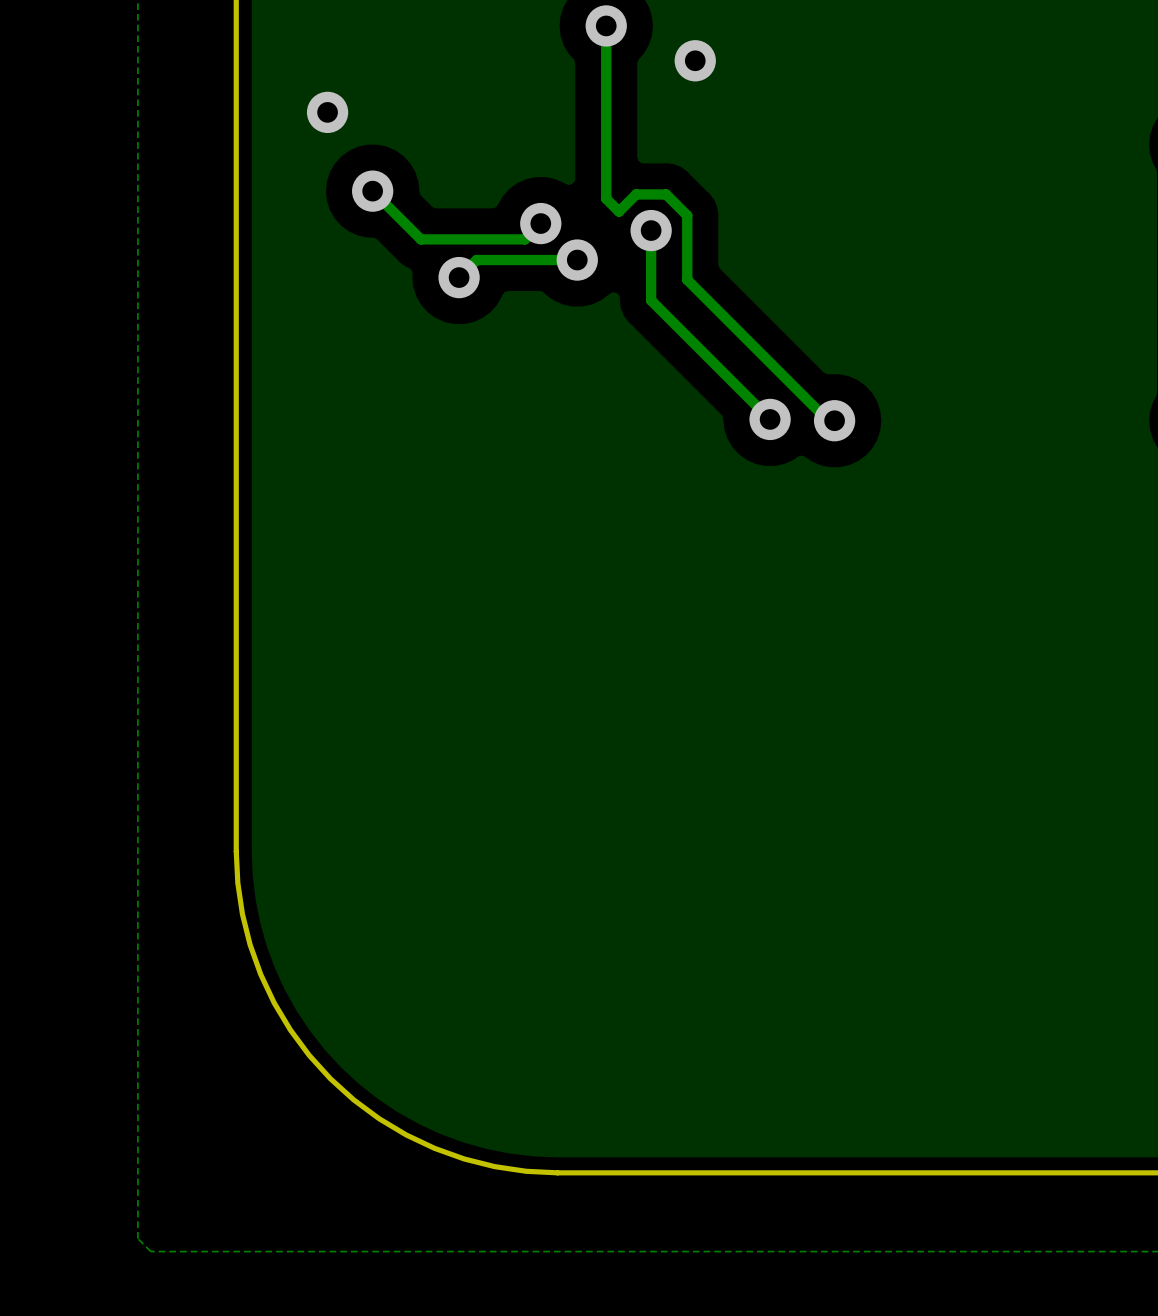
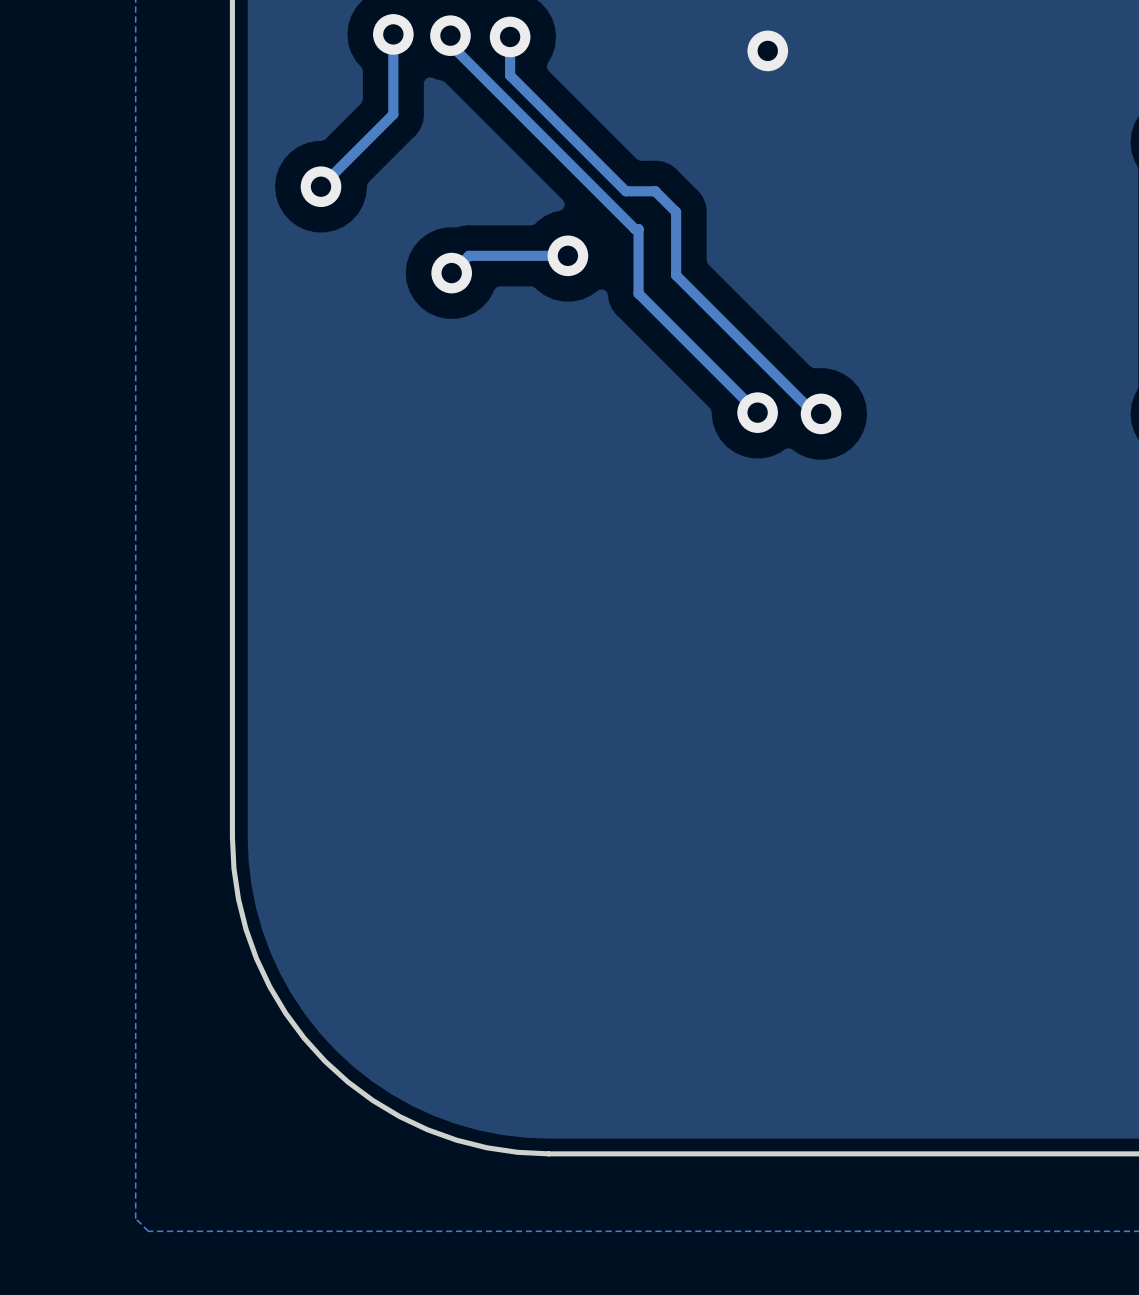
track: (606, 25) (606, 198) (619, 211) (636, 194) -> (510, 36) (510, 75) (625, 191)
via: (606, 25) -> none
track: none -> (393, 34) (393, 114) (321, 186)
via: none -> (393, 34)
via: none -> (450, 35)
via: none -> (510, 36)
via position: (695, 60) -> (767, 50)
via: (327, 112) -> none
via: none -> (321, 186)
track: (372, 191) (420, 239) (524, 239) (540, 223) -> none
via: (372, 191) -> none
via: (540, 223) -> none
track: (651, 230) (651, 300) -> (450, 35) (450, 44) (634, 229) (638, 229) (638, 293) (640, 295)
via: (651, 230) -> none

